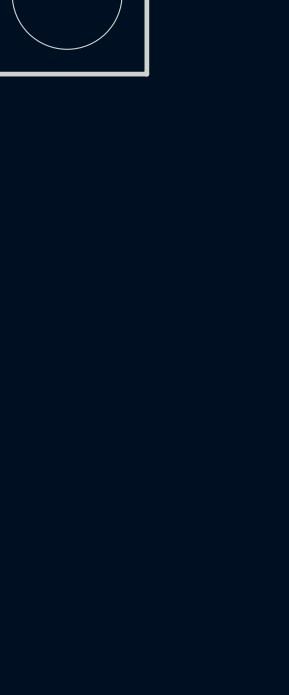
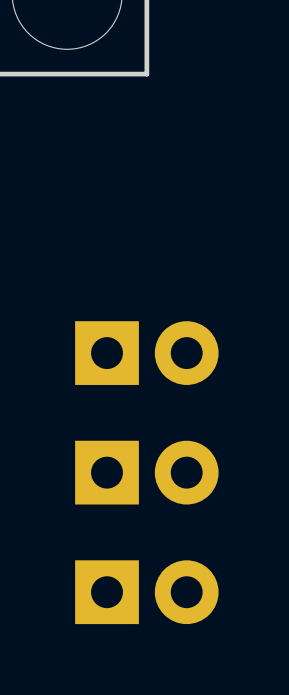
part: none -> (146, 353)
part: none -> (146, 472)
part: none -> (146, 592)

